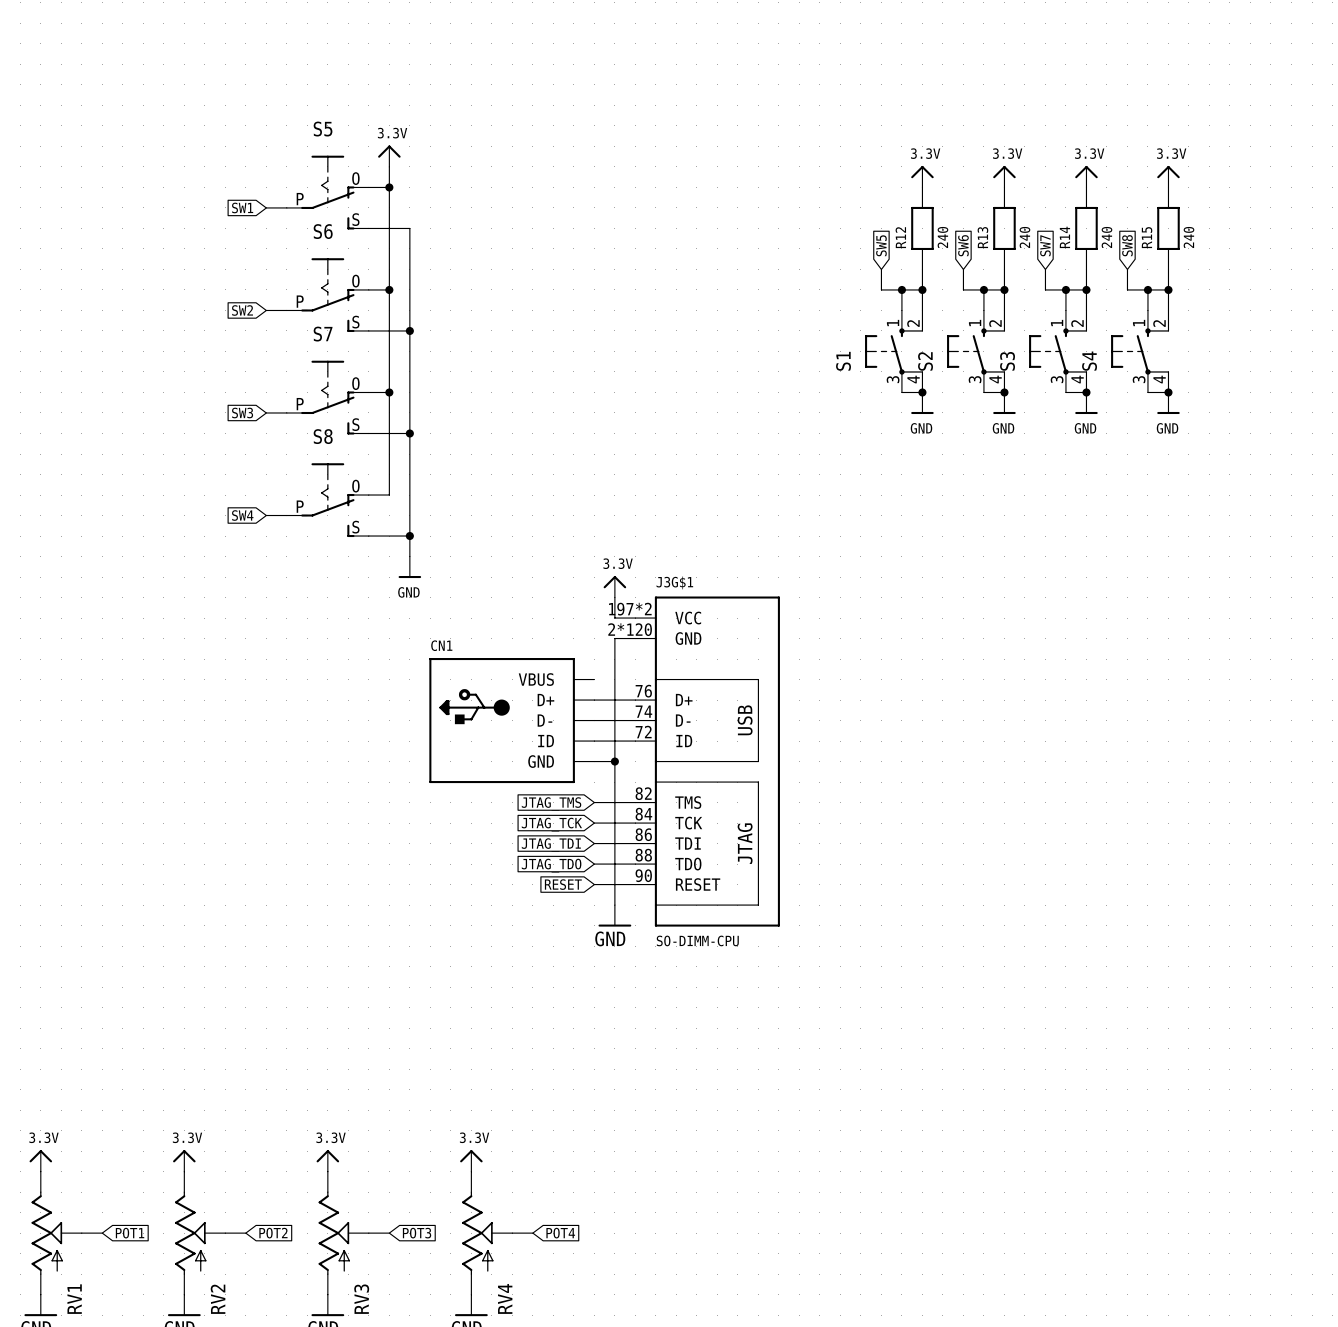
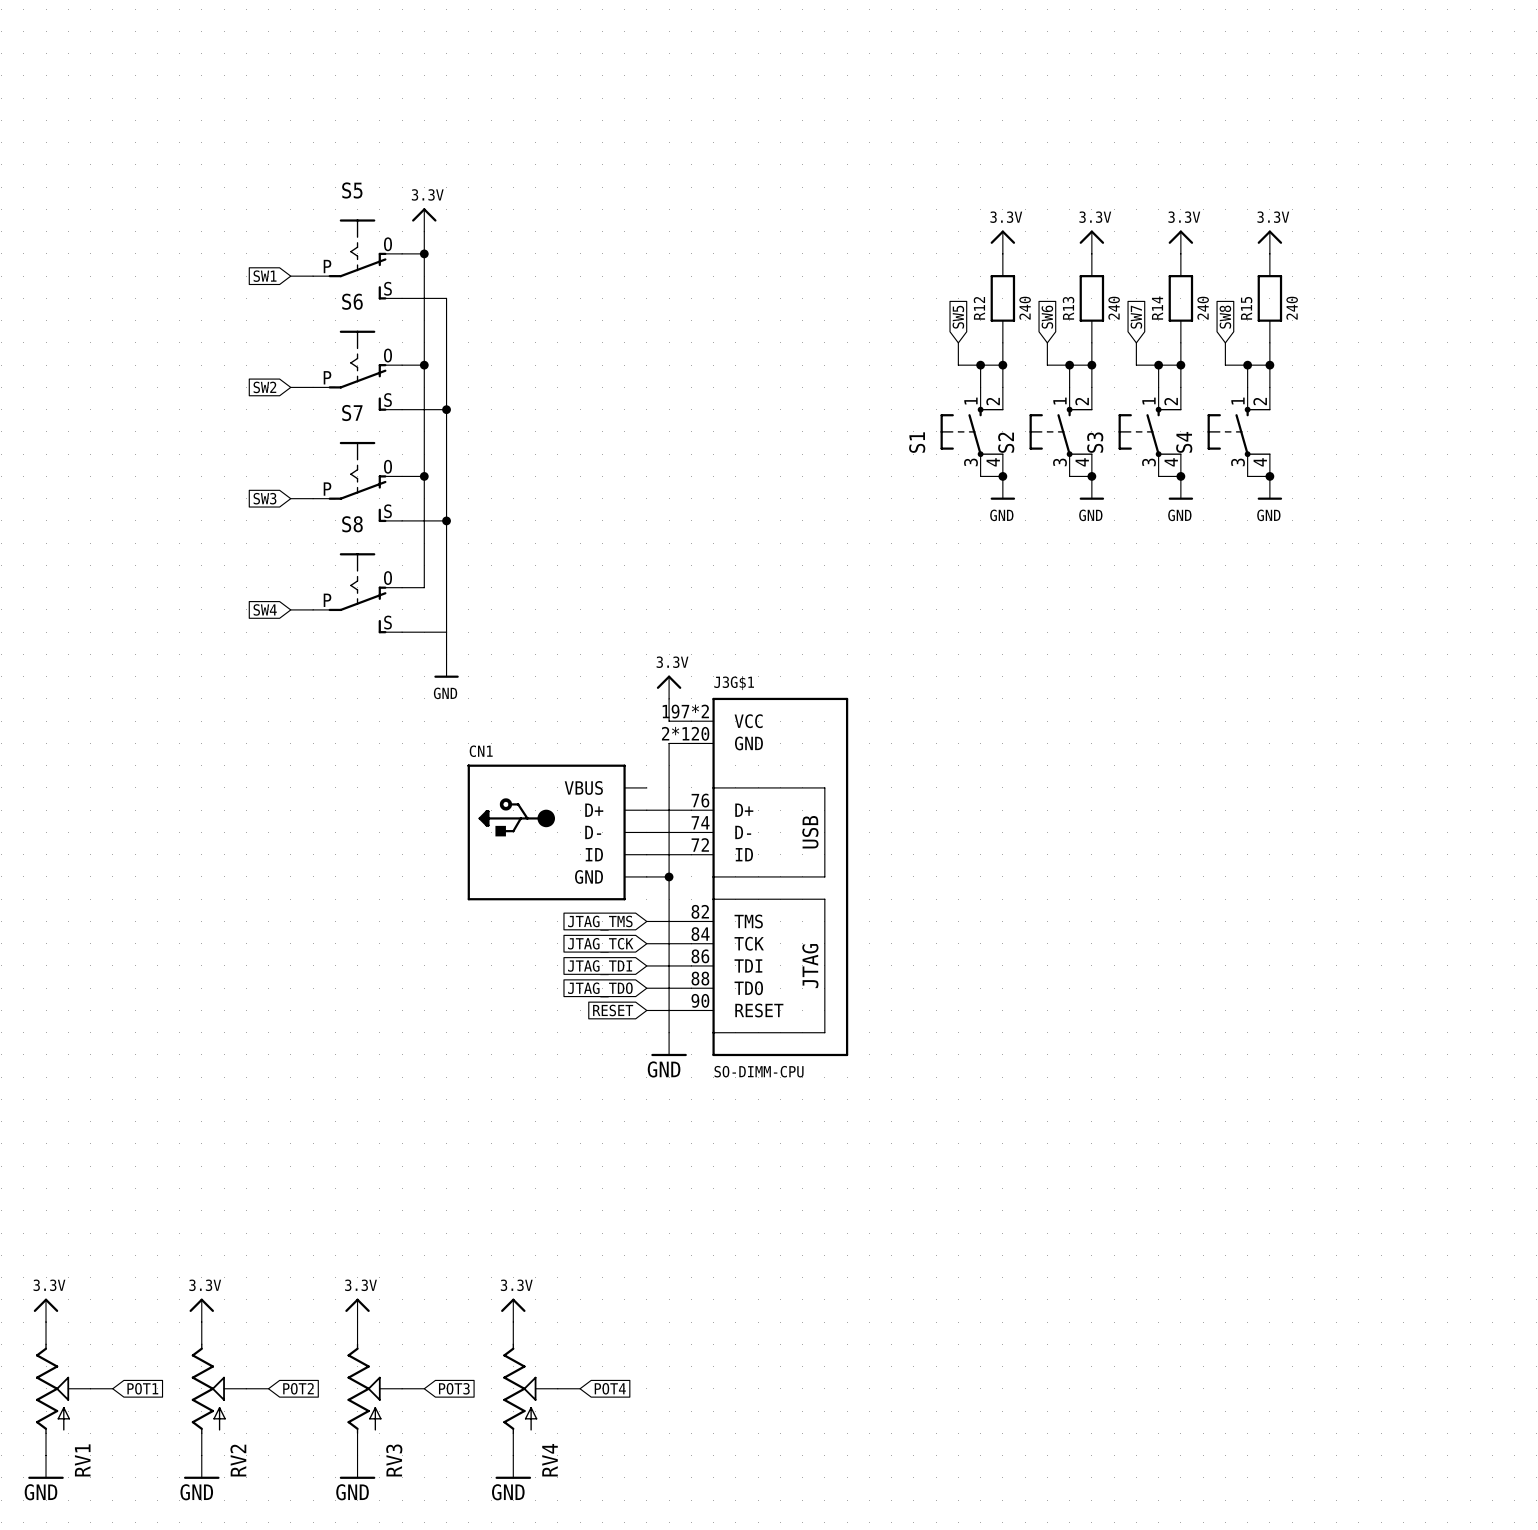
junction: (409, 536) -> none

